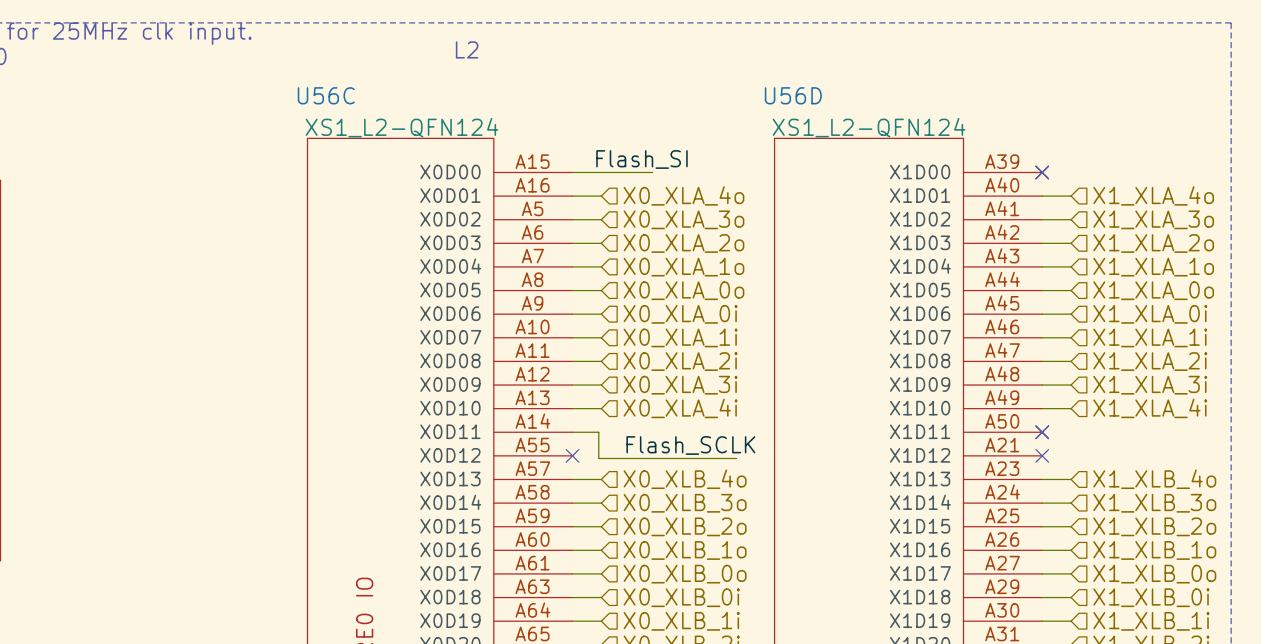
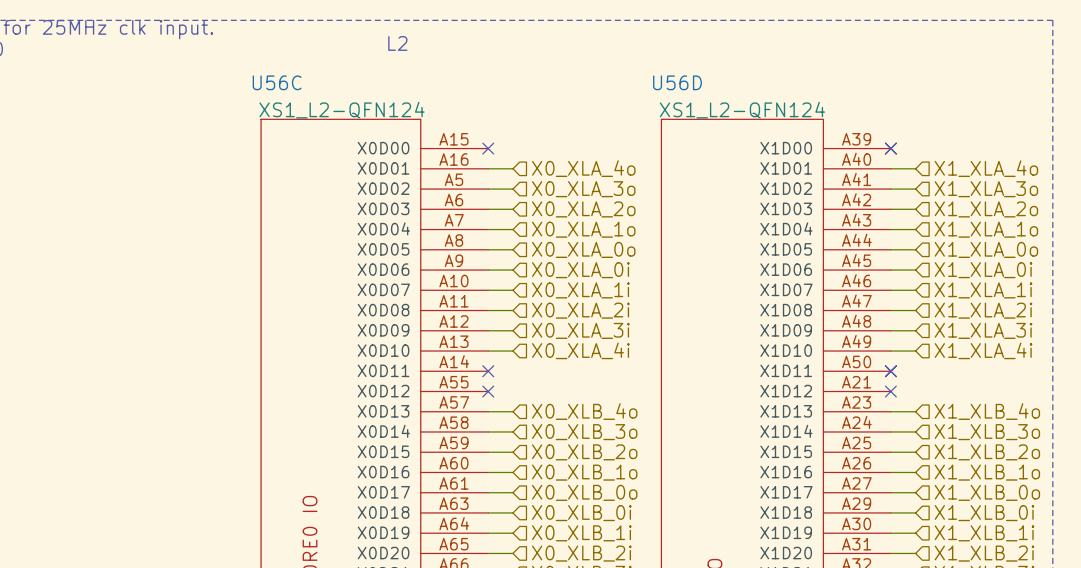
label: Flash_SI (641, 159) -> none
wire: (572, 172) (652, 172) -> none
no-connect mark: none -> (488, 148)
wire: (572, 432) (598, 432) (598, 458) (736, 458) -> none
no-connect mark: none -> (488, 371)
label: Flash_SCLK (690, 445) -> none

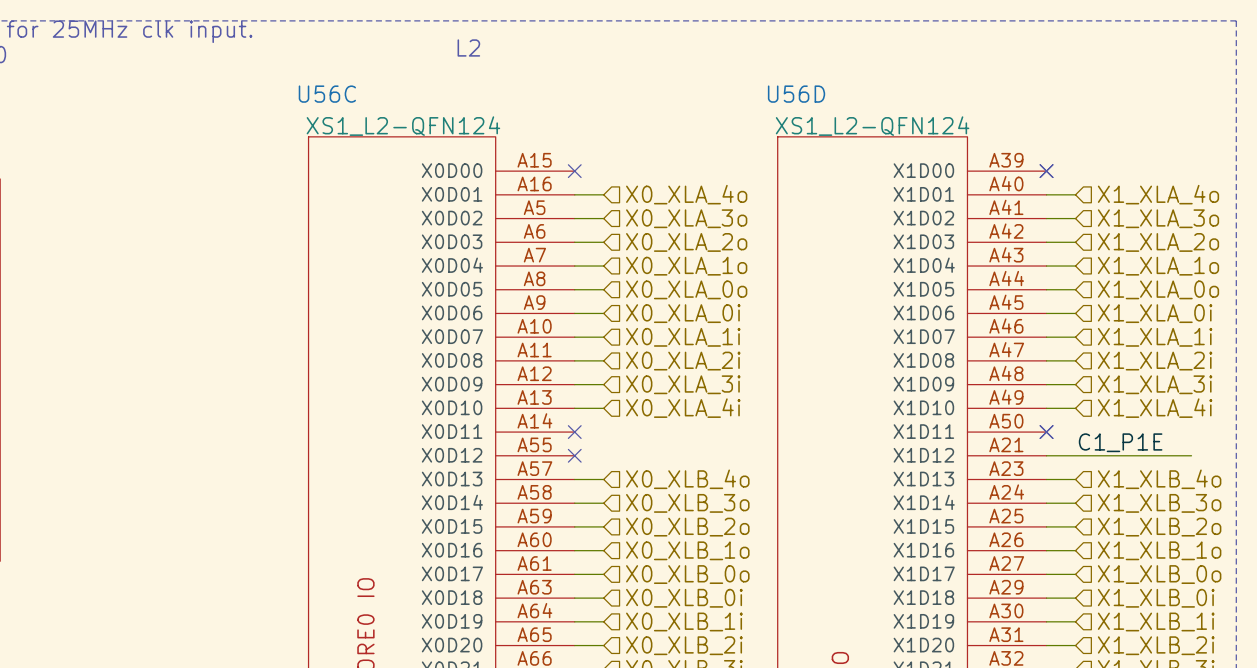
label: none -> C1_P1E (1120, 442)
wire: none -> (1046, 455) (1191, 455)
no-connect mark: (890, 391) -> none

